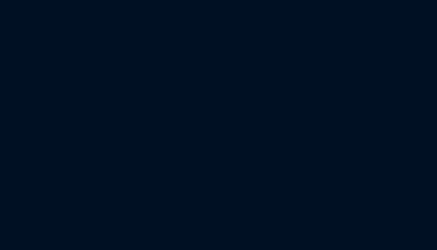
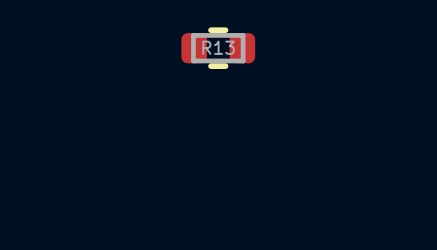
R13: none -> (218, 48)

